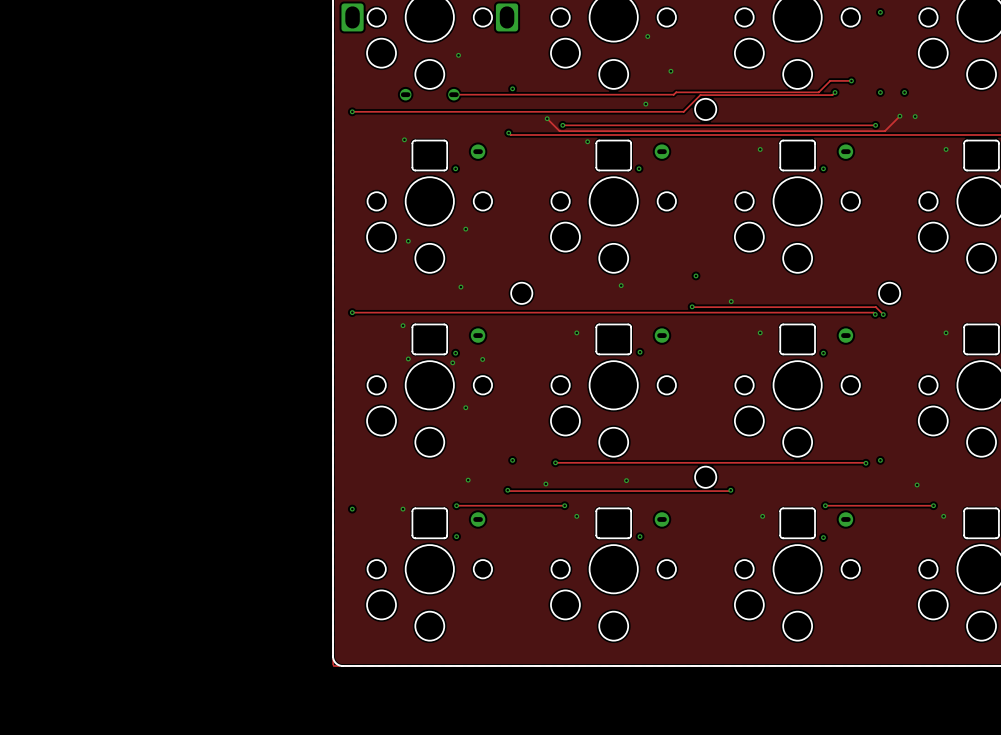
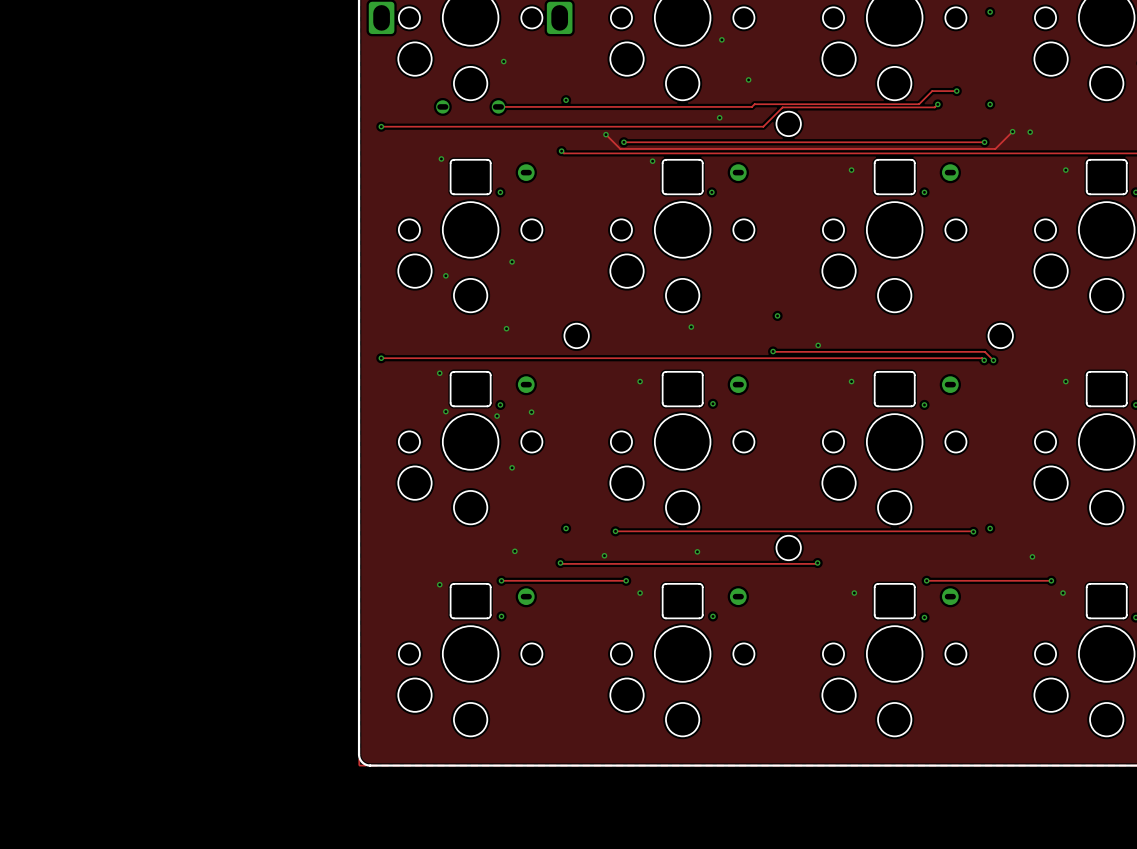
via: (904, 92) -> none
via: (352, 509) -> none

